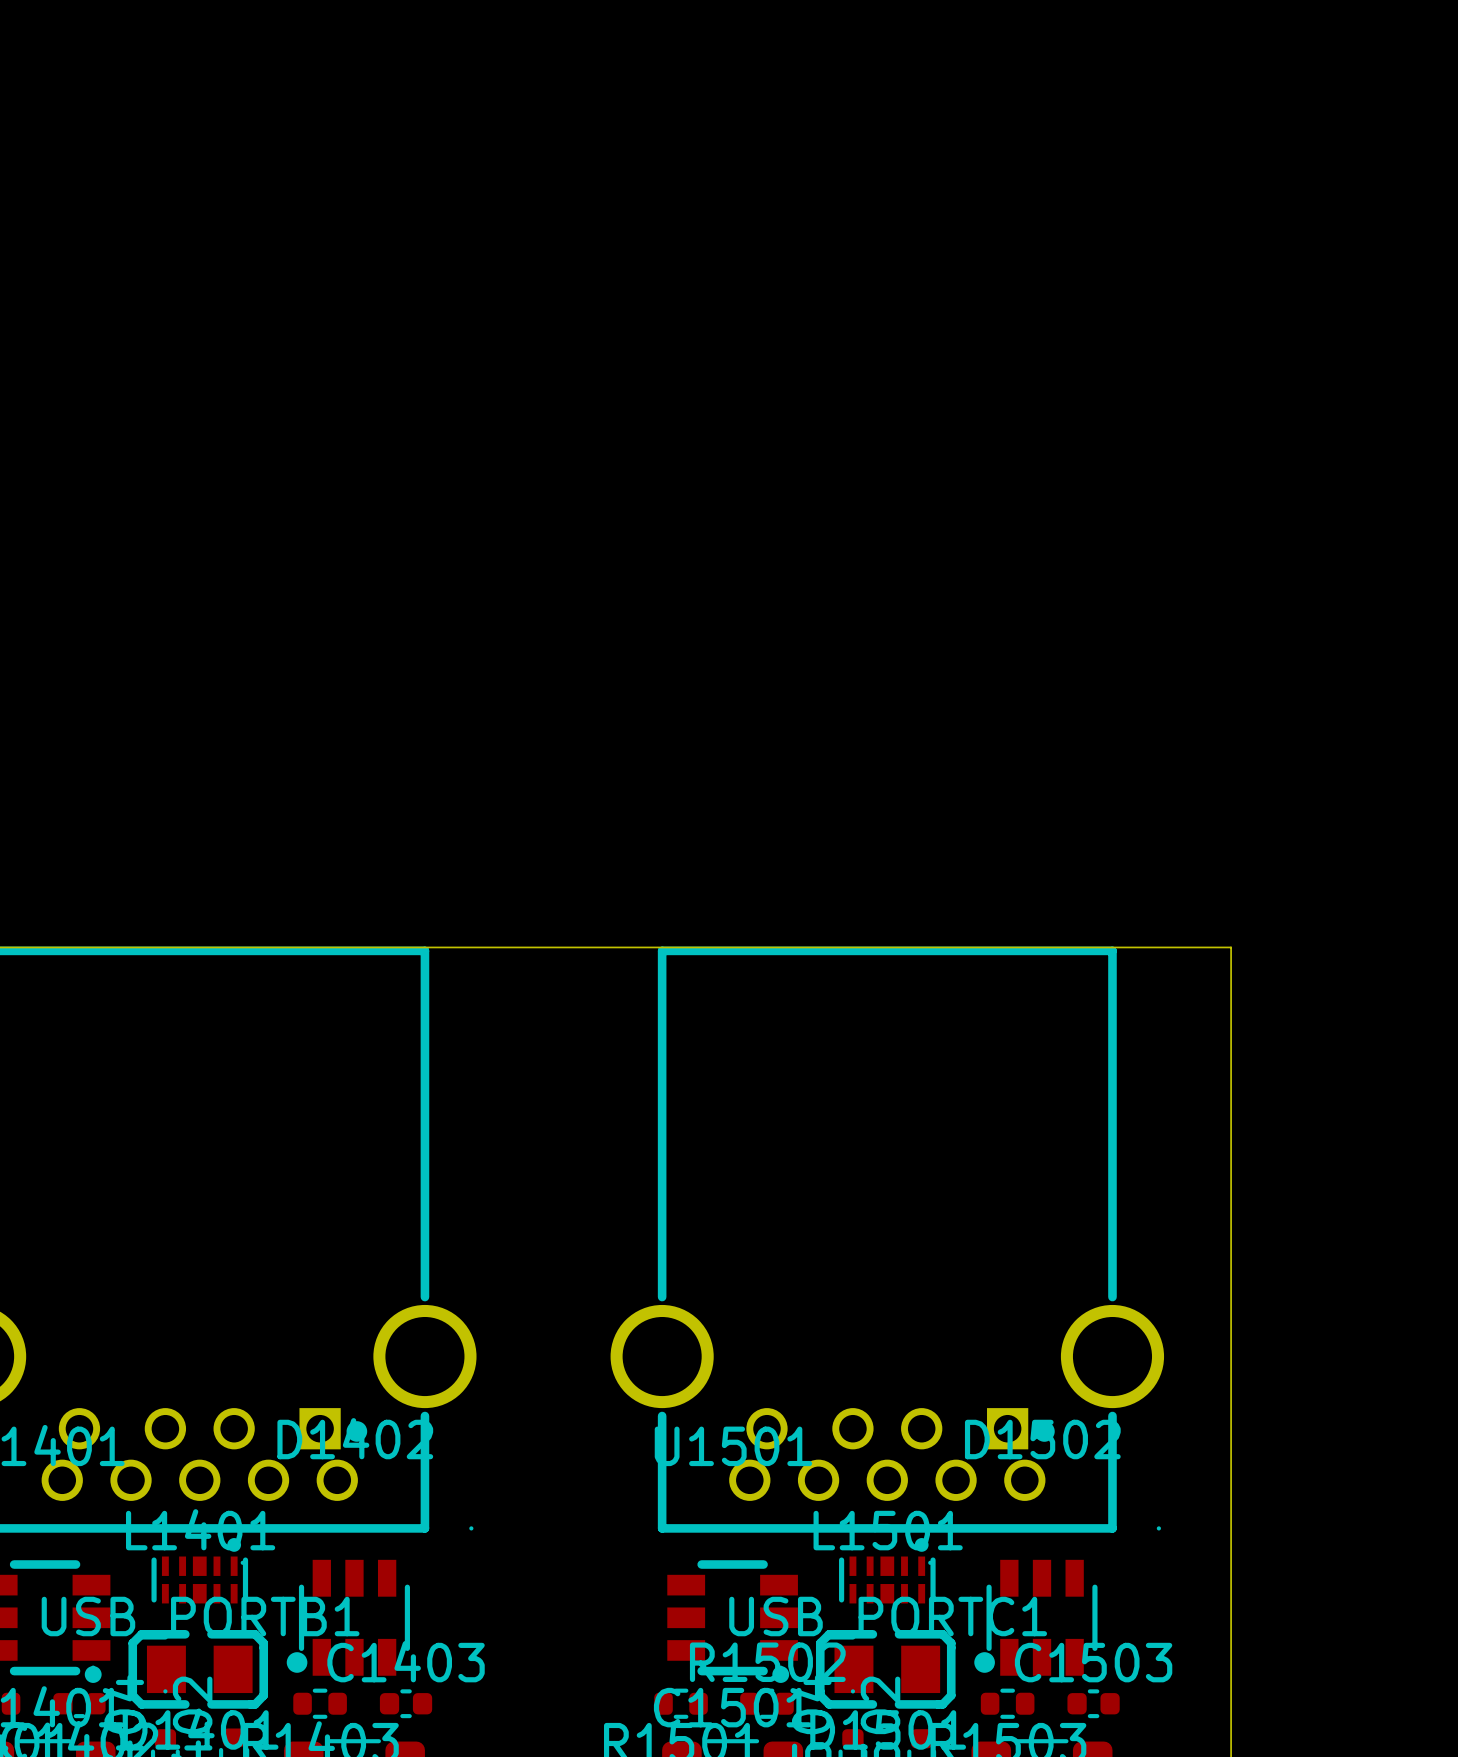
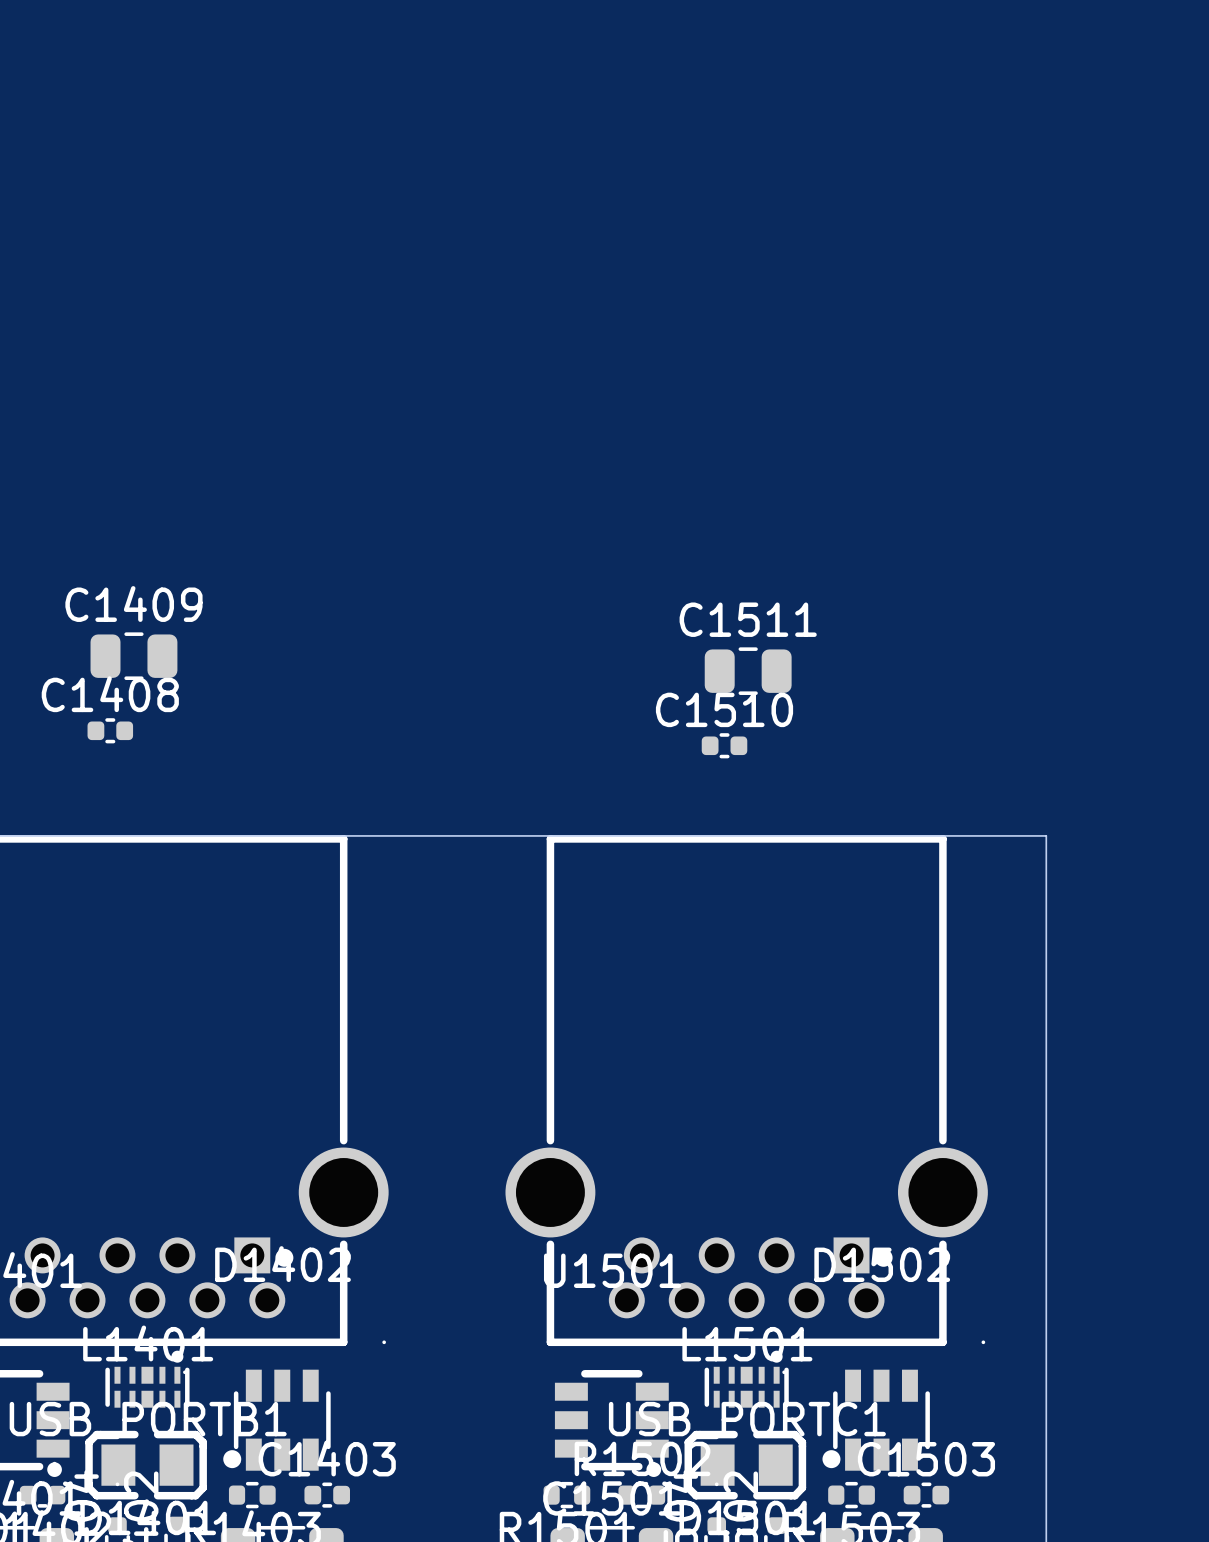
C1409: none -> (133, 656)
C1511: none -> (748, 671)
C1408: none -> (110, 730)
C1510: none -> (724, 745)

